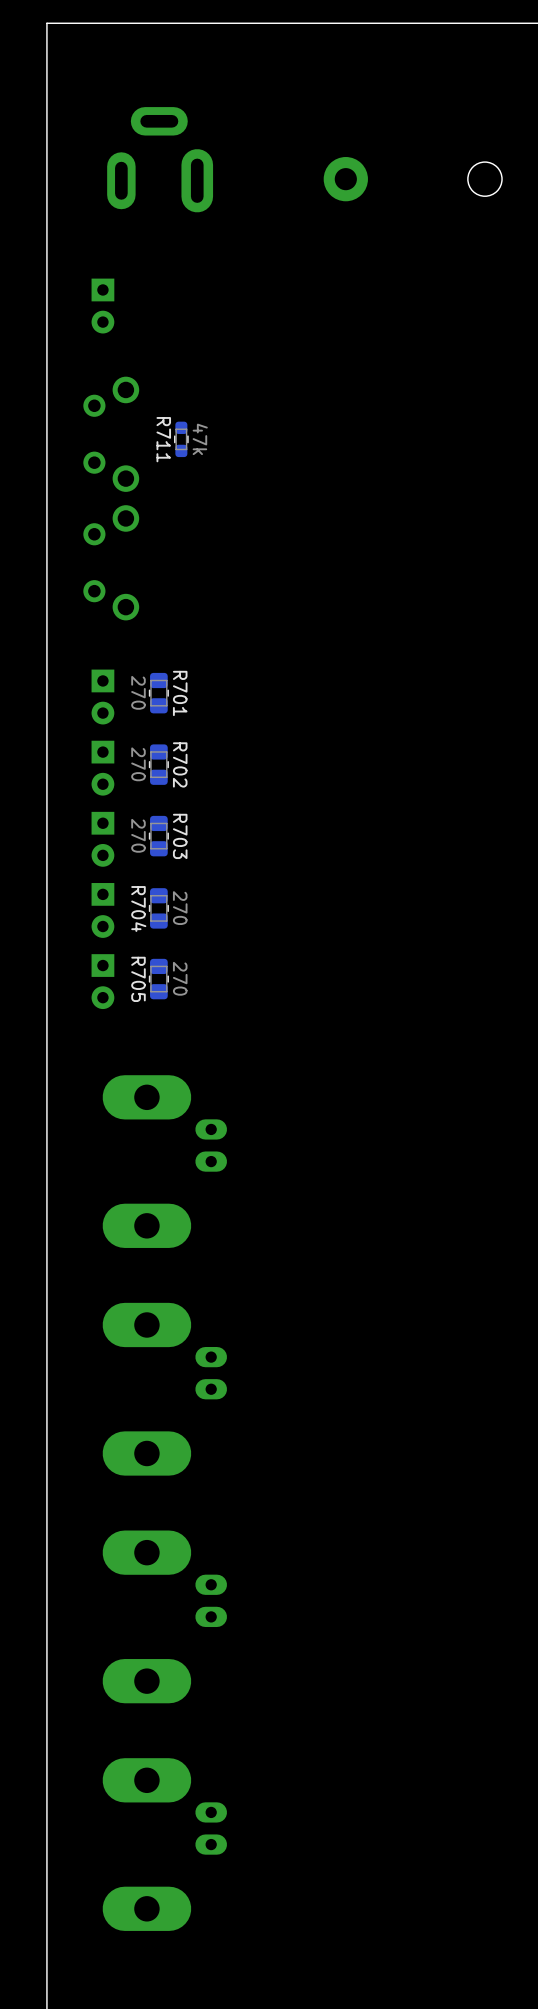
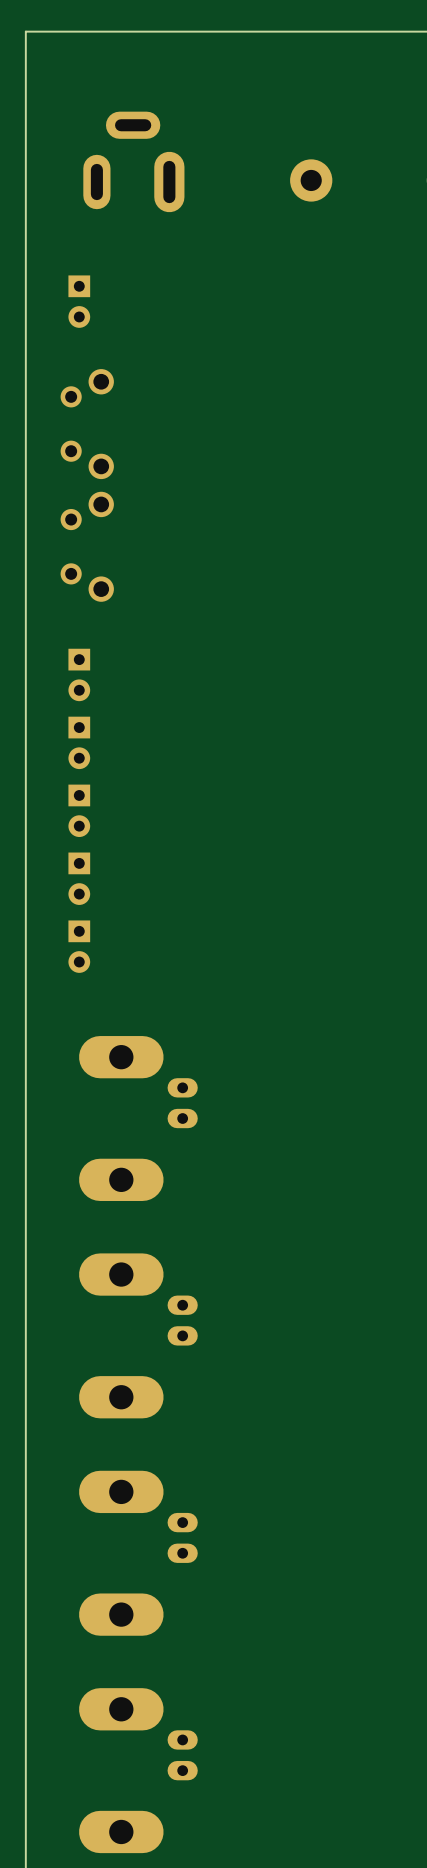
R711: 47k (181, 439) -> none
R701: 270 (158, 693) -> none
R702: 270 (158, 764) -> none
R703: 270 (158, 836) -> none
R704: 270 (158, 908) -> none
R705: 270 (158, 979) -> none

